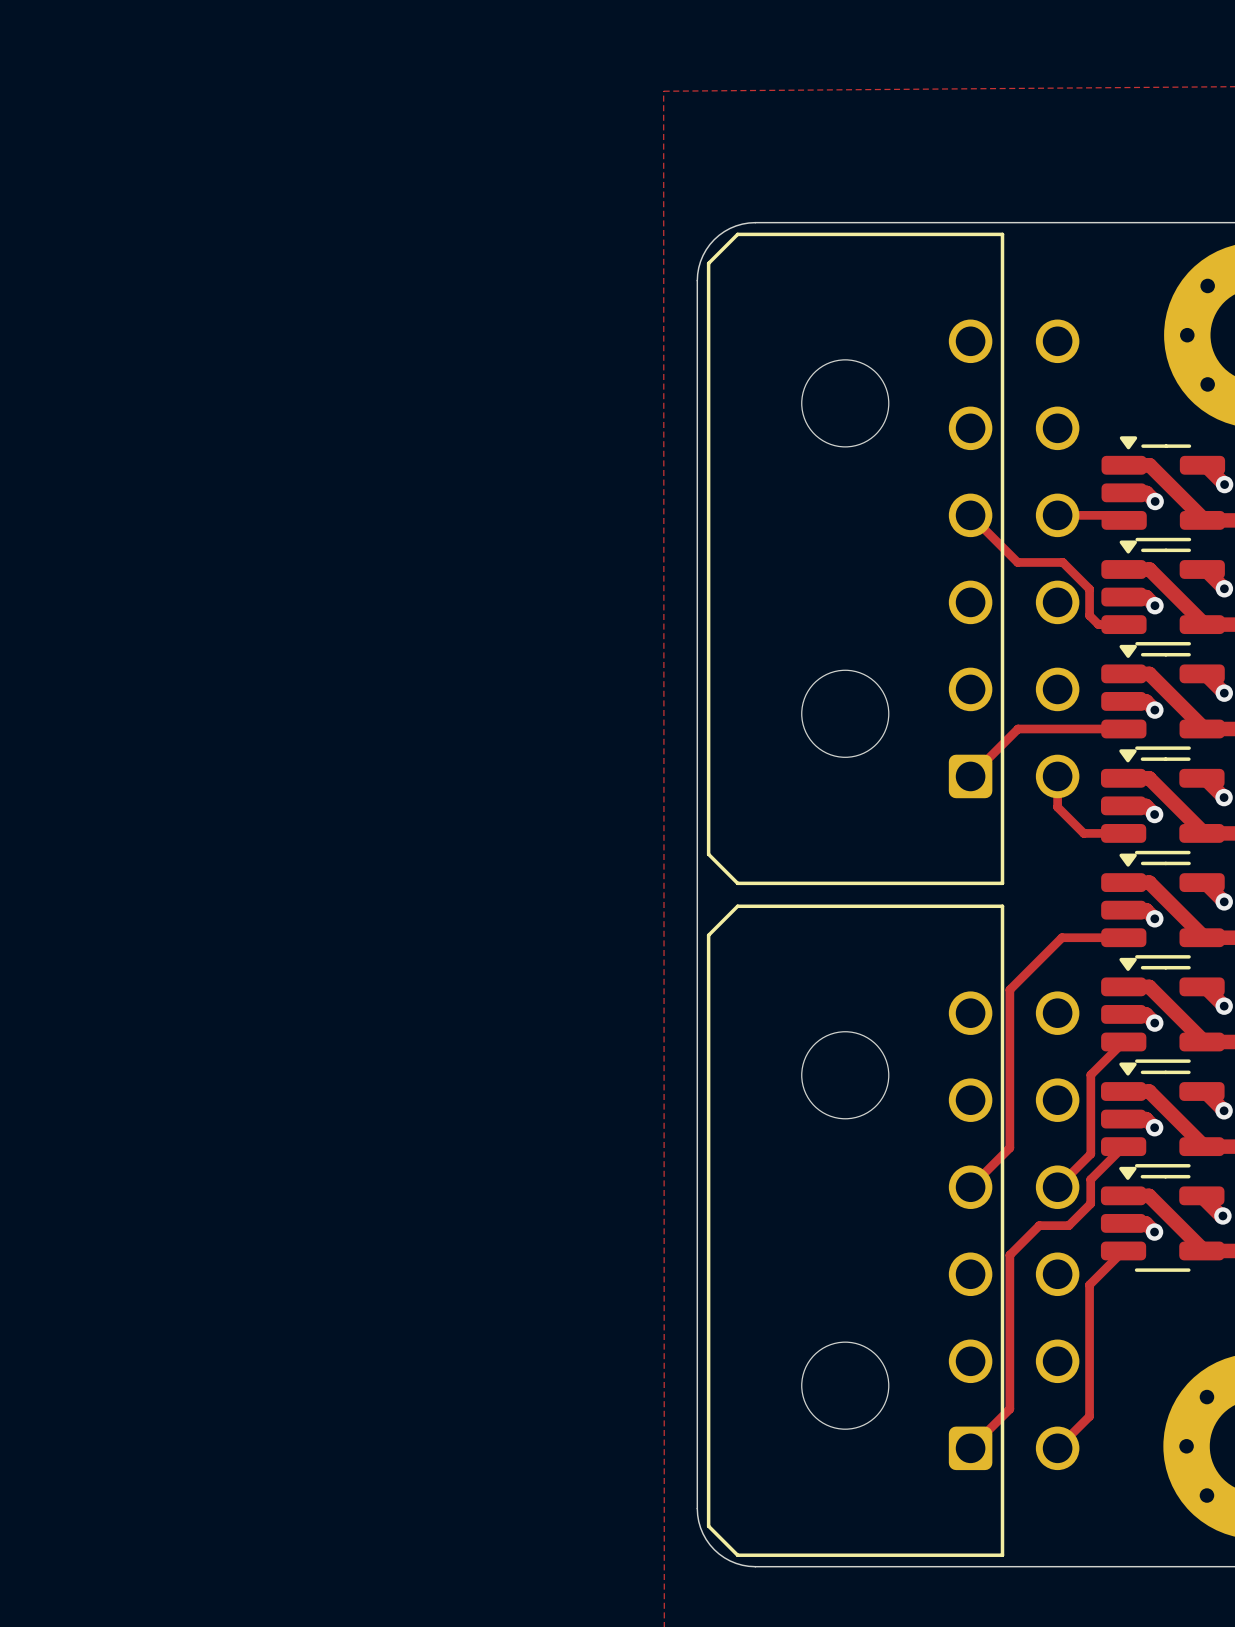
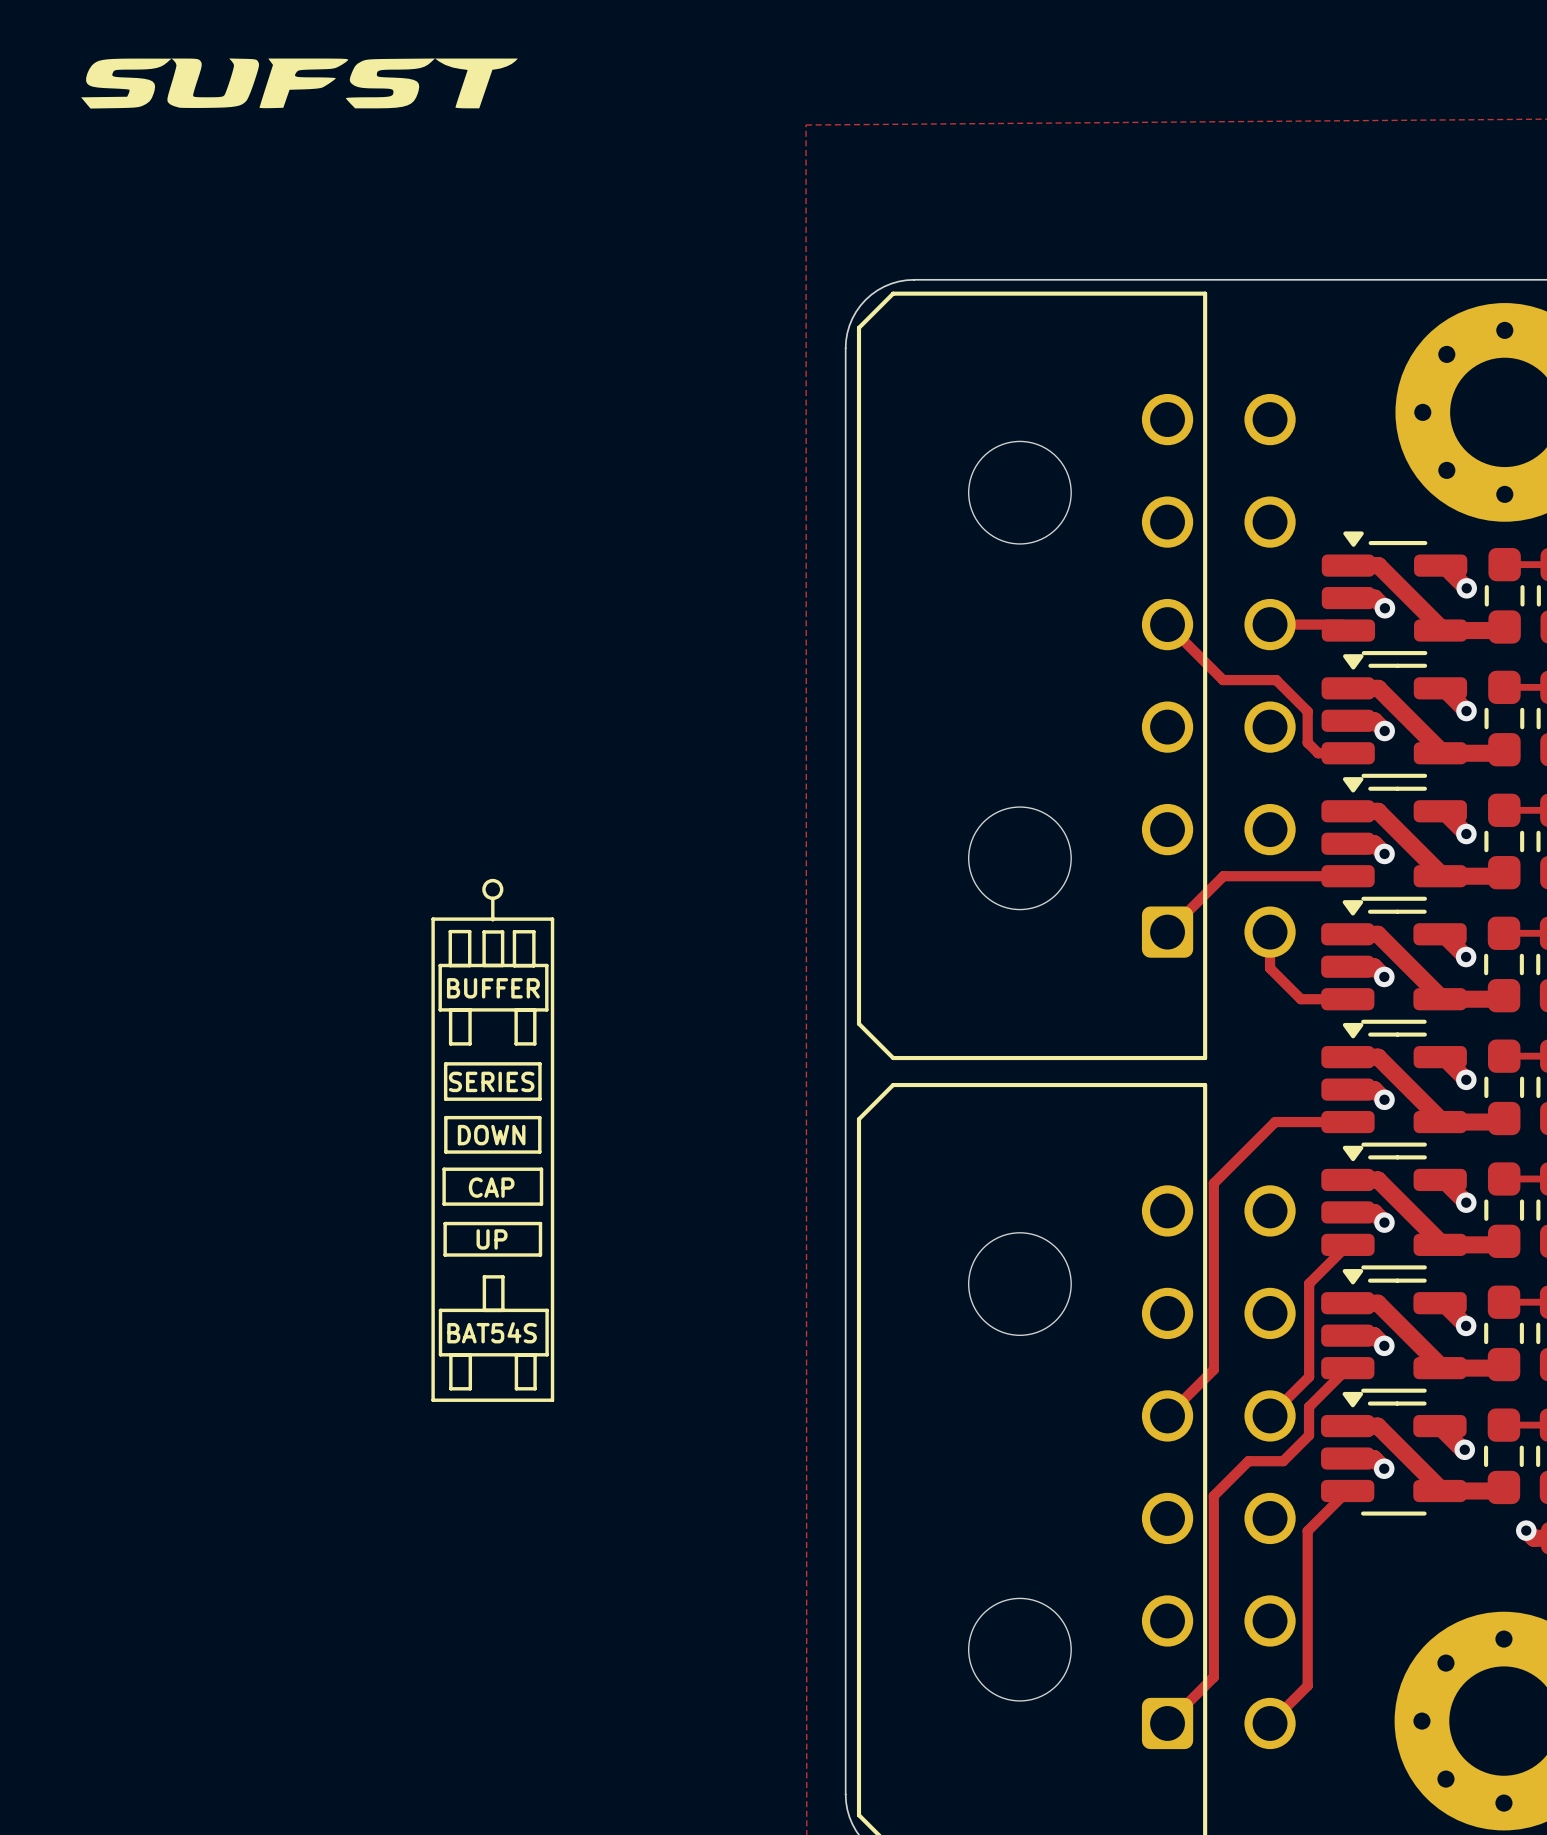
drawing: none -> [81, 58, 518, 109]
drawing: none -> [482, 878, 504, 901]
line: none -> (492, 898) (492, 919)
line: none -> (433, 919) (552, 919) (552, 1400) (433, 1400) (433, 919)
line: none -> (440, 965) (546, 965) (546, 1009) (440, 1009) (440, 965)
line: none -> (450, 965) (450, 931) (469, 931) (469, 965)
line: none -> (484, 965) (484, 931) (502, 931) (502, 965)
line: none -> (514, 965) (514, 931) (533, 931) (533, 965)
text: none -> BUFFER (493, 988)
line: none -> (450, 1009) (450, 1043) (470, 1043) (470, 1009)
line: none -> (516, 1009) (516, 1043) (534, 1043) (534, 1009)
line: none -> (445, 1063) (539, 1063) (539, 1099) (445, 1099) (445, 1063)
text: none -> SERIES (491, 1081)
line: none -> (445, 1117) (539, 1117) (539, 1152) (445, 1152) (445, 1117)
text: none -> DOWN (491, 1135)
line: none -> (444, 1169) (541, 1169) (541, 1204) (444, 1204) (444, 1169)
text: none -> CAP (491, 1187)
line: none -> (445, 1223) (540, 1223) (540, 1255) (445, 1255) (445, 1223)
text: none -> UP (492, 1239)
line: none -> (440, 1310) (547, 1310) (547, 1354) (440, 1354) (440, 1310)
line: none -> (484, 1310) (484, 1276) (502, 1276) (502, 1310)
text: none -> BAT54S (492, 1332)
line: none -> (450, 1354) (450, 1388) (470, 1388) (470, 1354)
line: none -> (516, 1354) (516, 1388) (535, 1388) (535, 1354)

